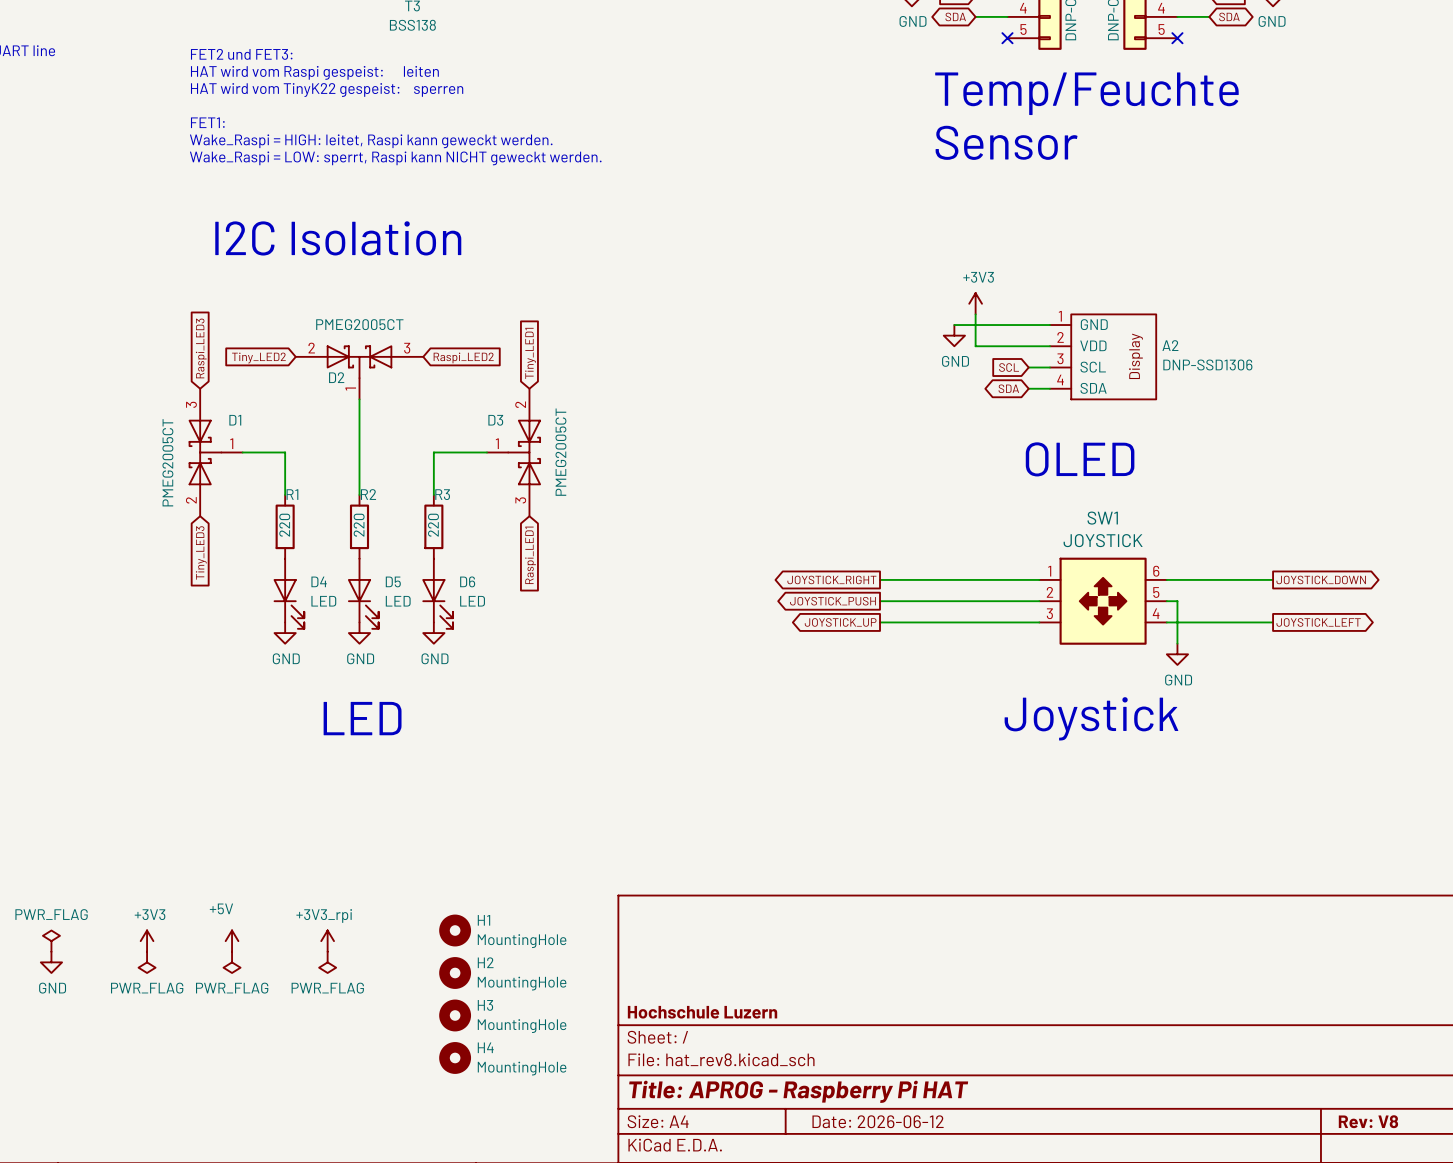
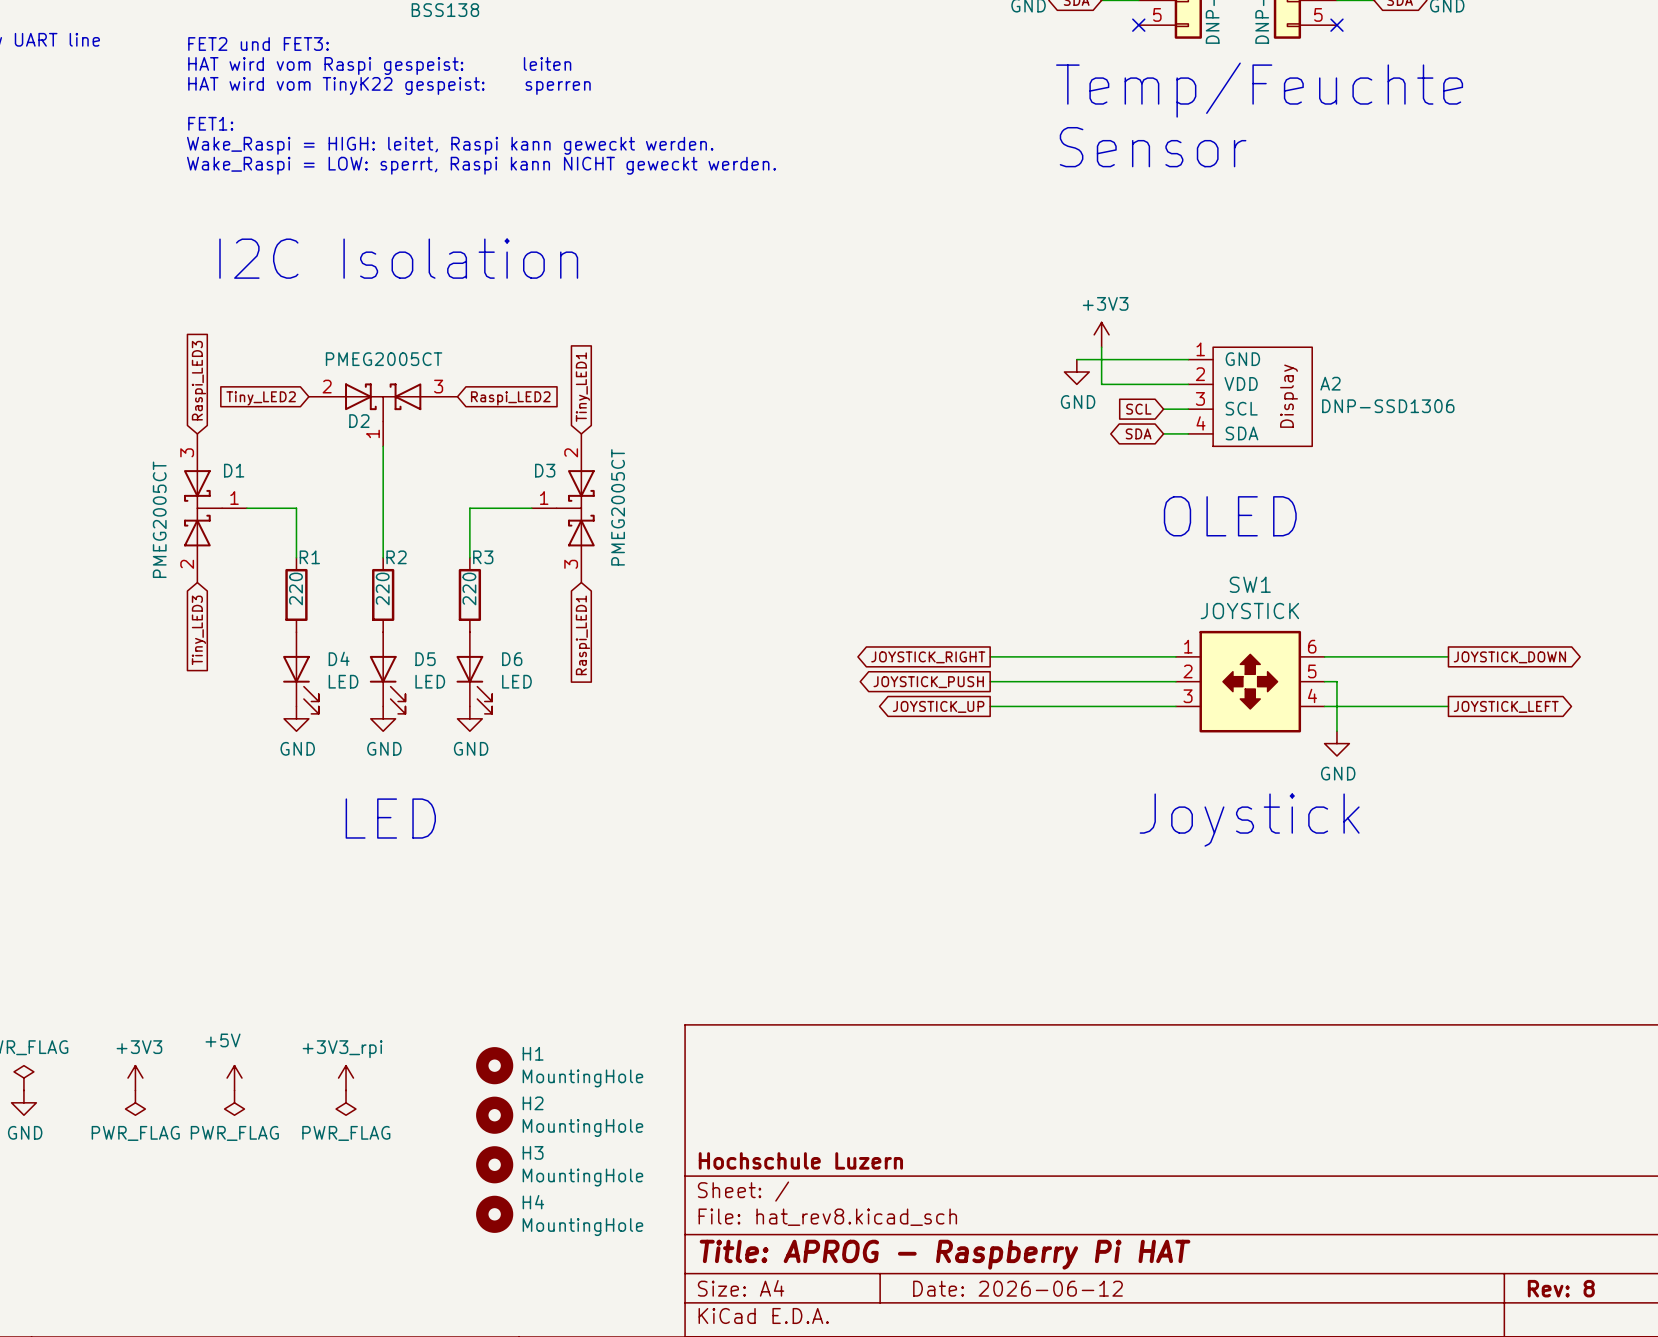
title block: Rev: V8 (1368, 1121) -> Rev: 8 (1561, 1288)

